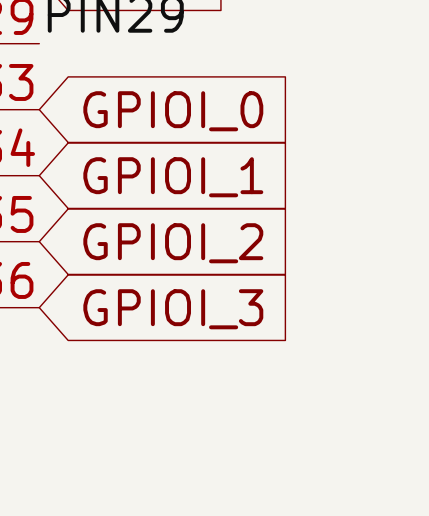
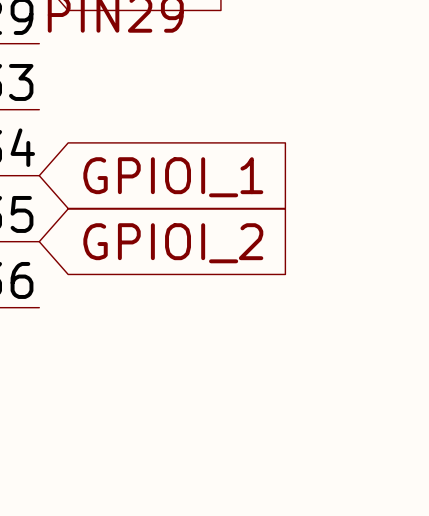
global label: GPIOI_0 (173, 111) -> none
global label: GPIOI_3 (173, 309) -> none

